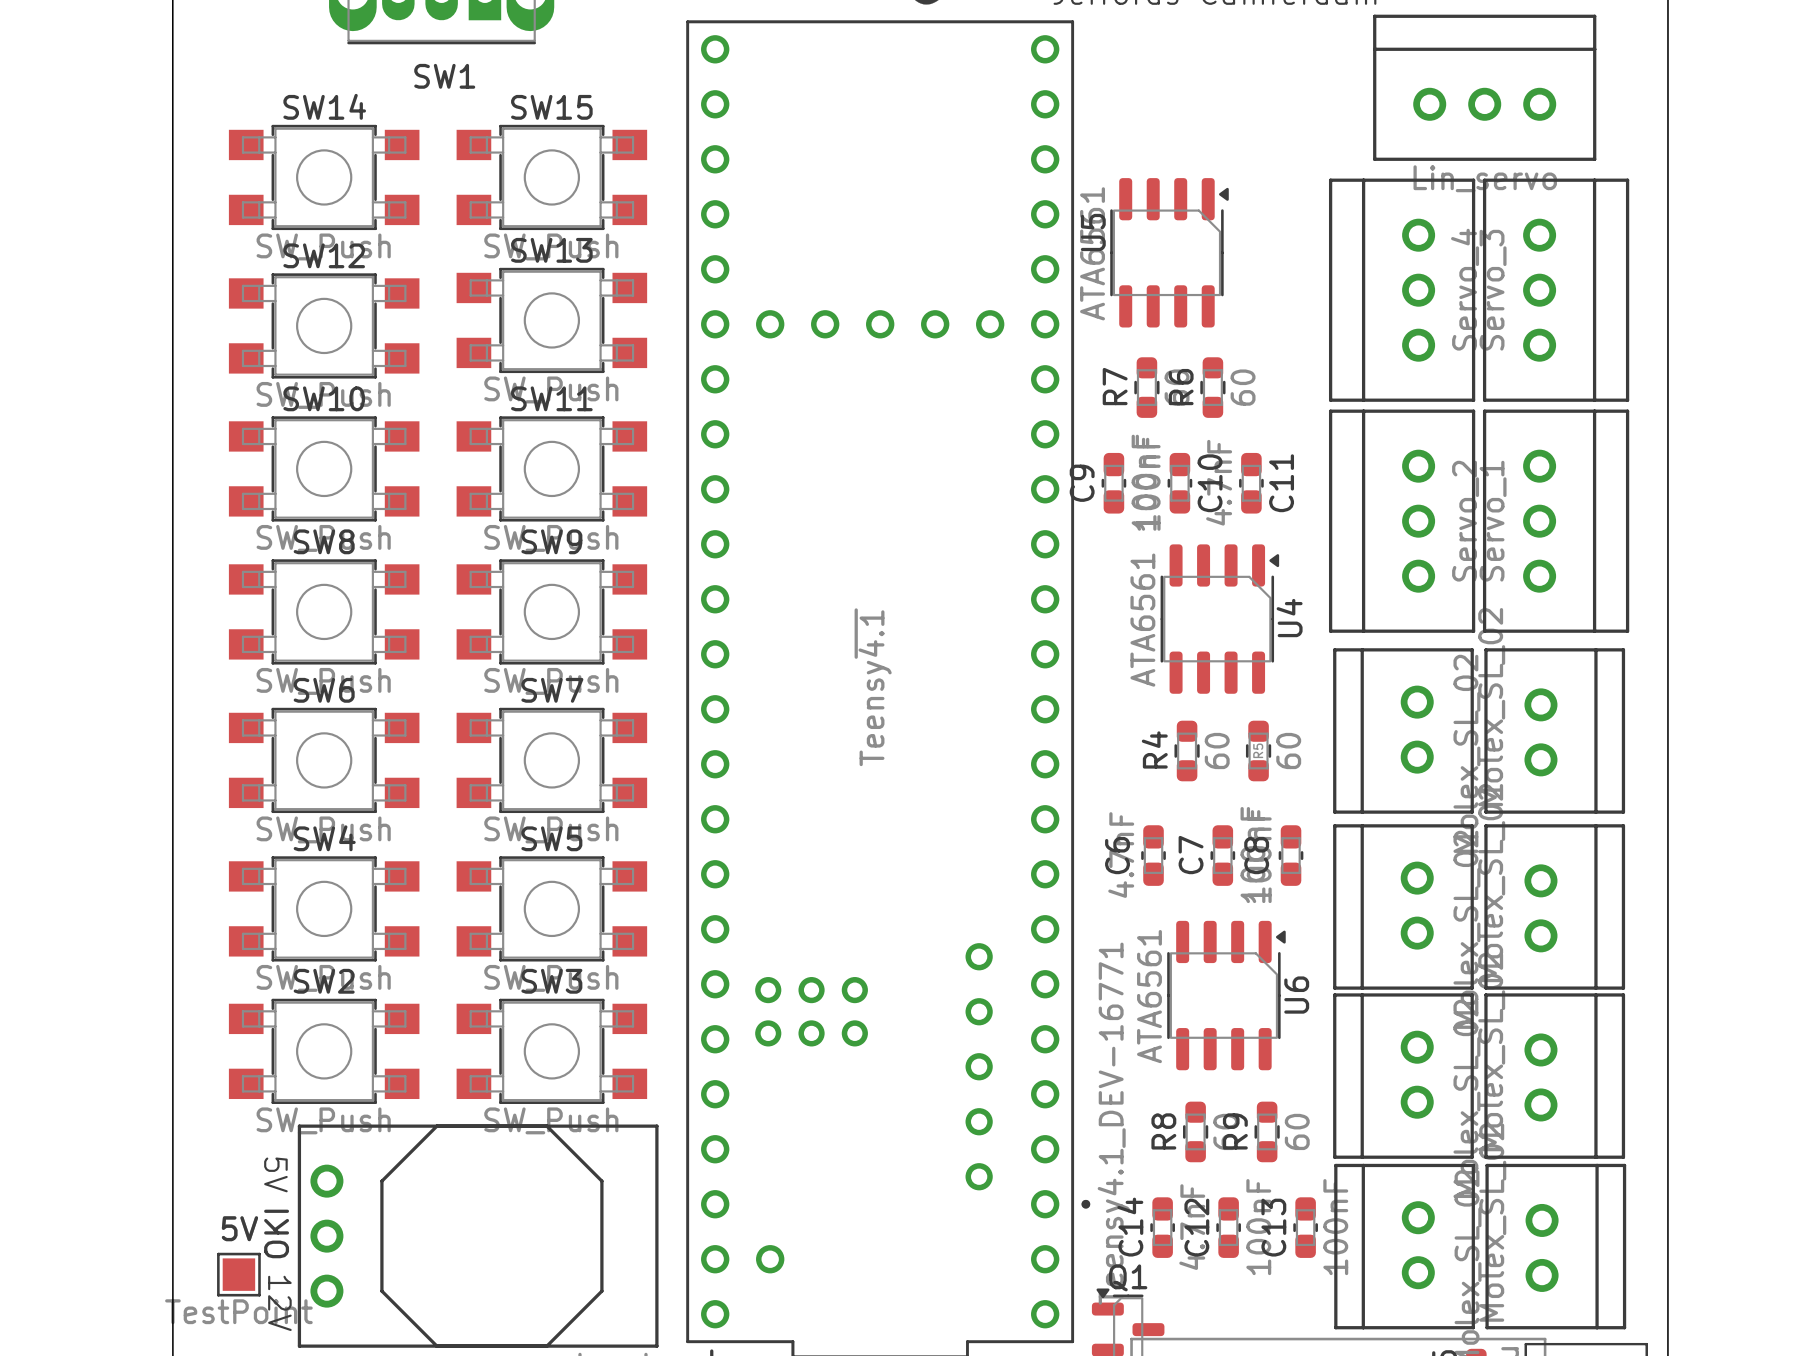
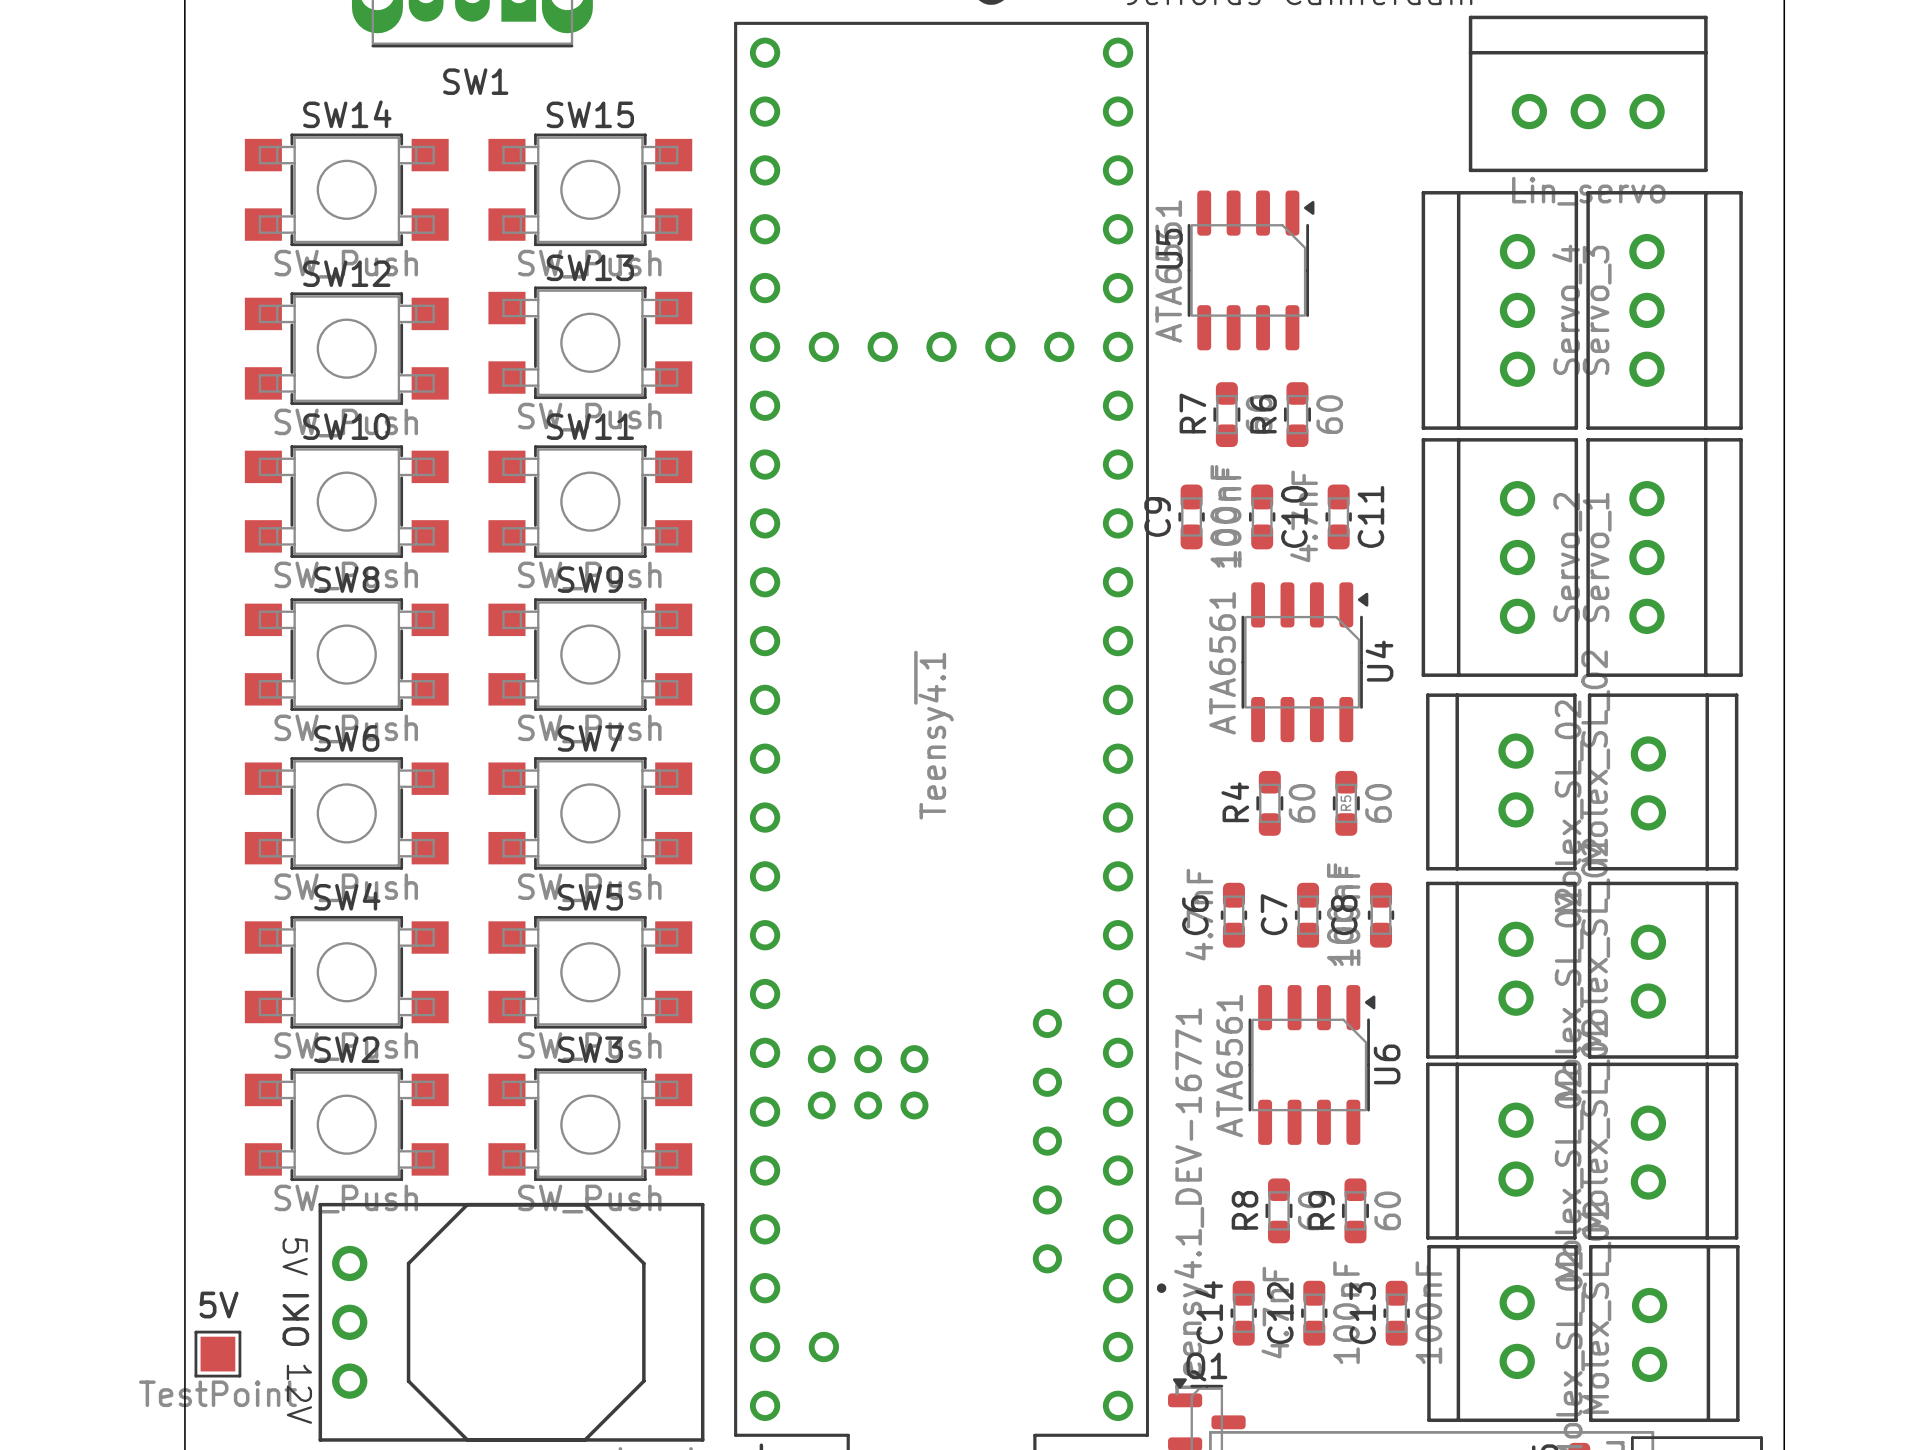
5V position: (238, 1274) -> (217, 1354)

